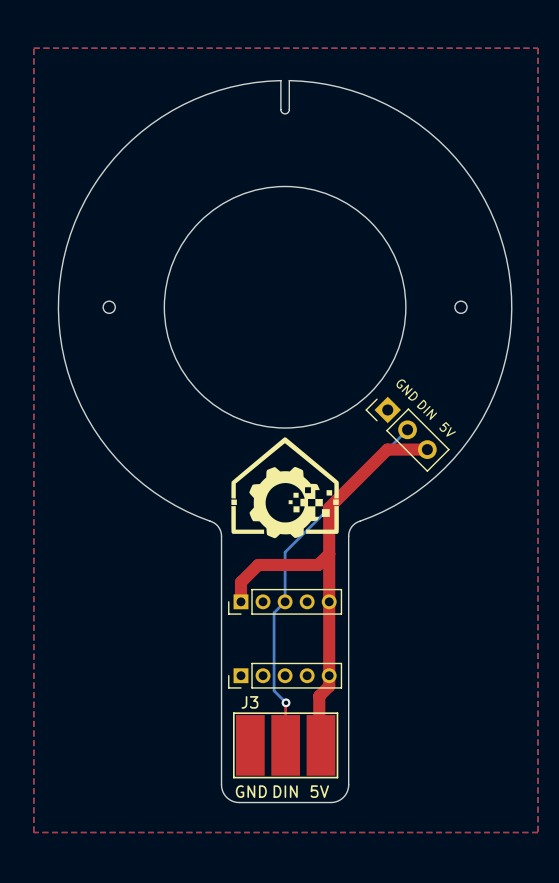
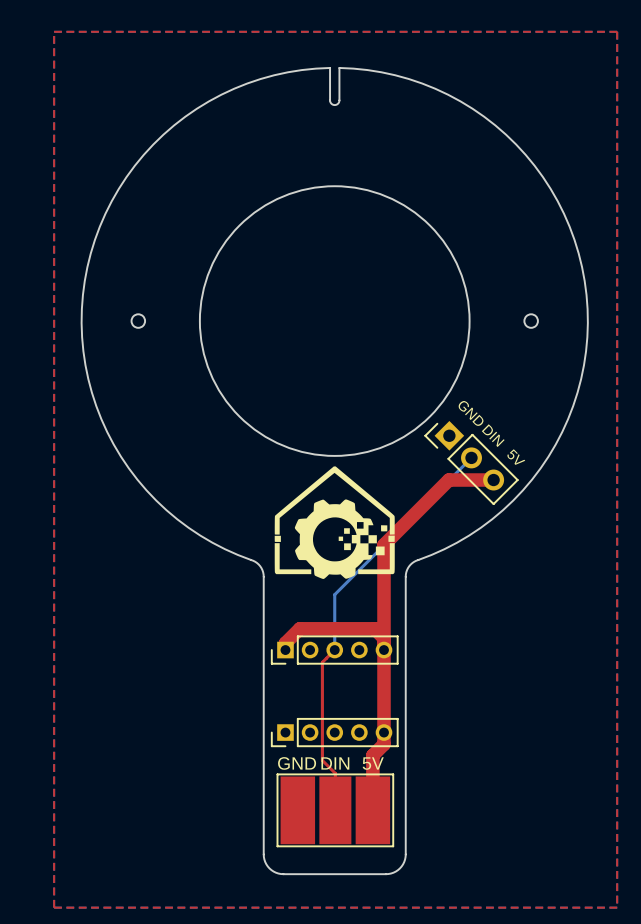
top track: (329, 553) (318, 564) (258, 564) (240, 582) (240, 595) -> (384, 638) (374, 628) (299, 628) (285, 643)
bottom track: (285, 601) (274, 612) (274, 690) (286, 702) -> none
top track: (286, 702) (285, 712) -> (334, 650) (322, 662) (322, 760) (335, 773)
via: (286, 702) -> none
J3: (285, 745) -> none
part: none -> (335, 810)
text position: GND (251, 791) -> GND (297, 763)
text position: DIN (285, 791) -> DIN (335, 763)
text position: 5V (319, 791) -> 5V (373, 763)

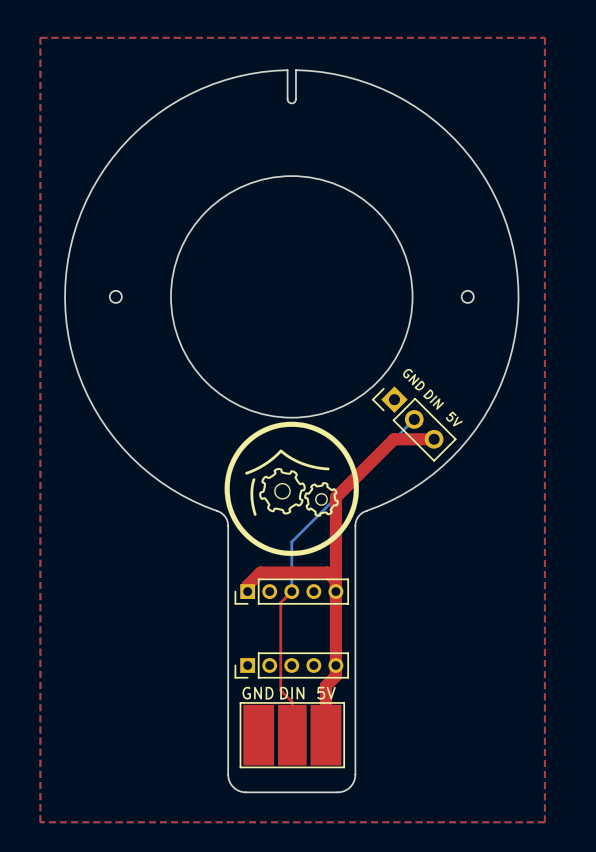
drawing: none -> [224, 421, 359, 556]
drawing: [274, 466, 395, 579] -> none

